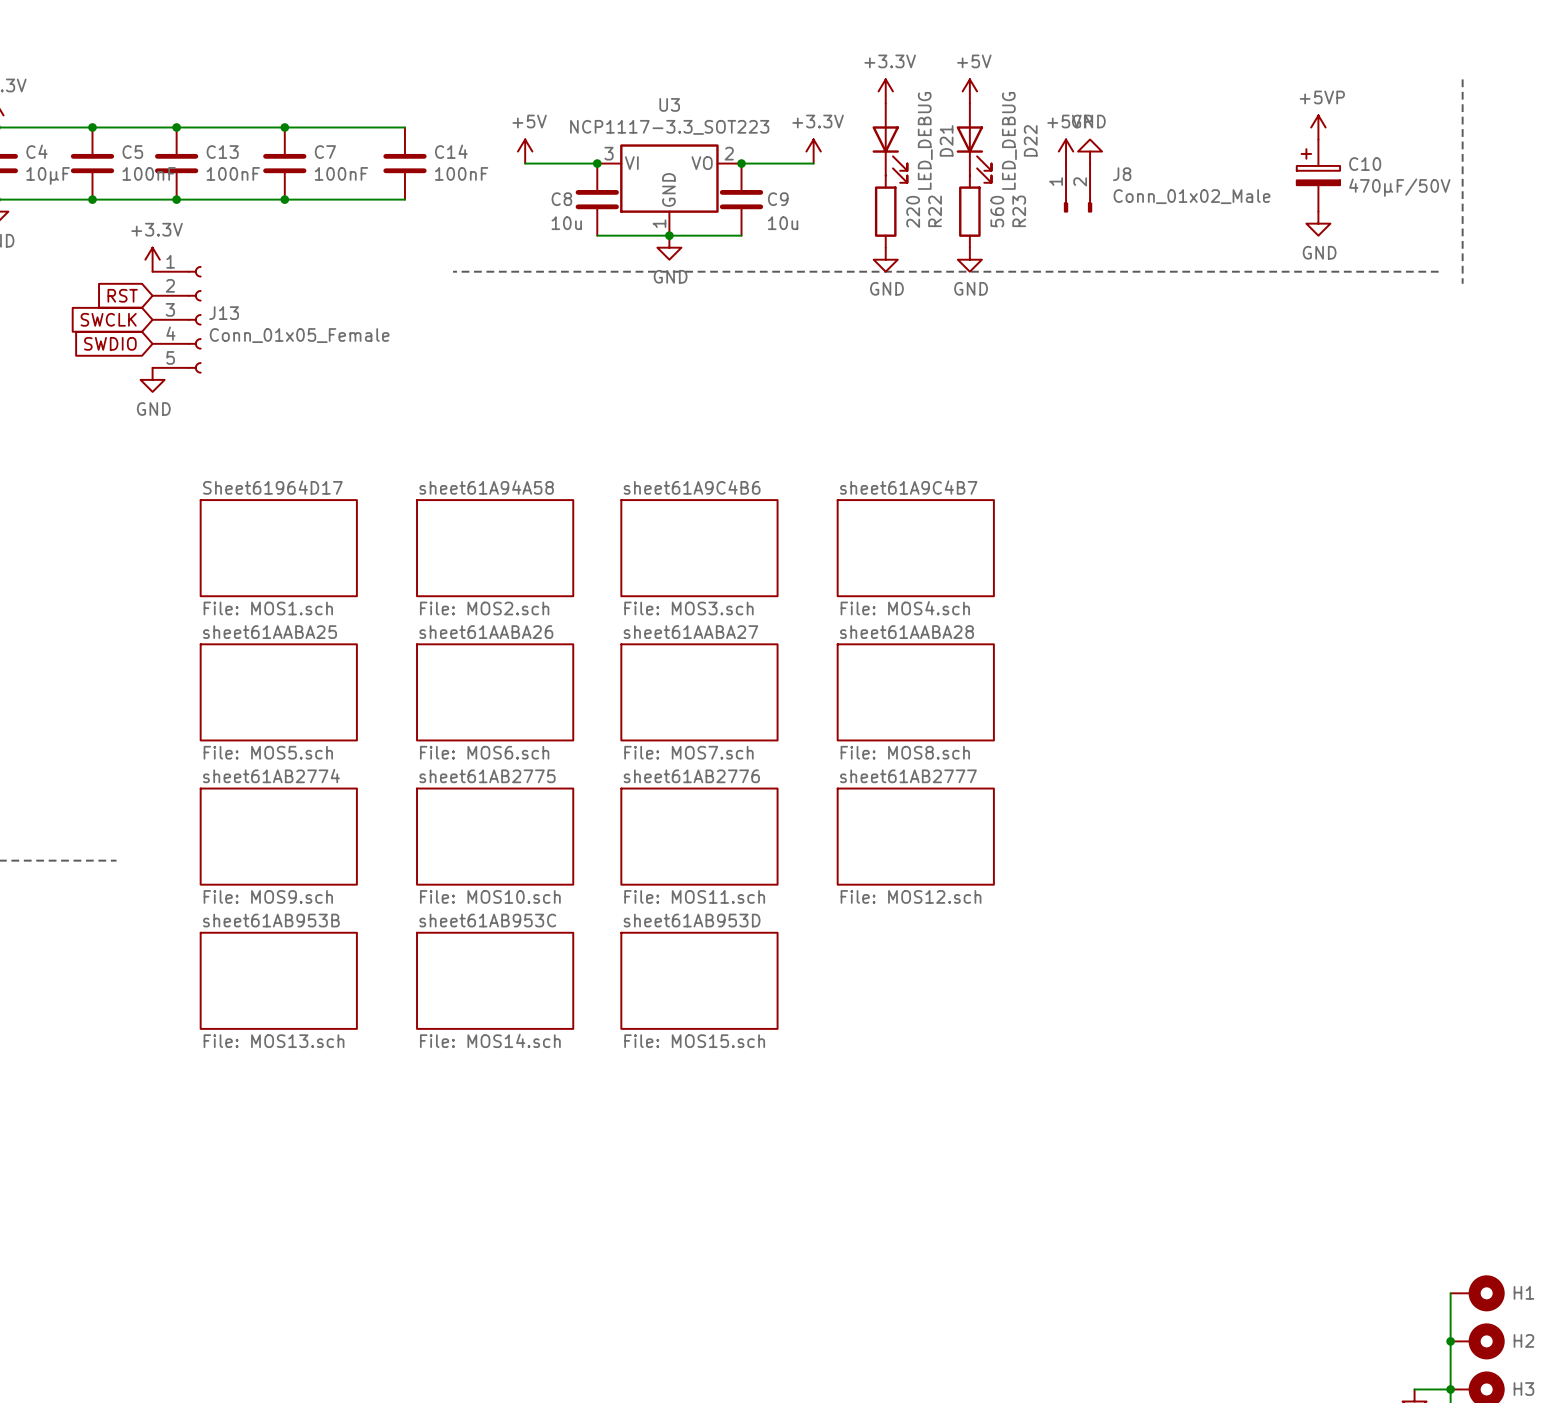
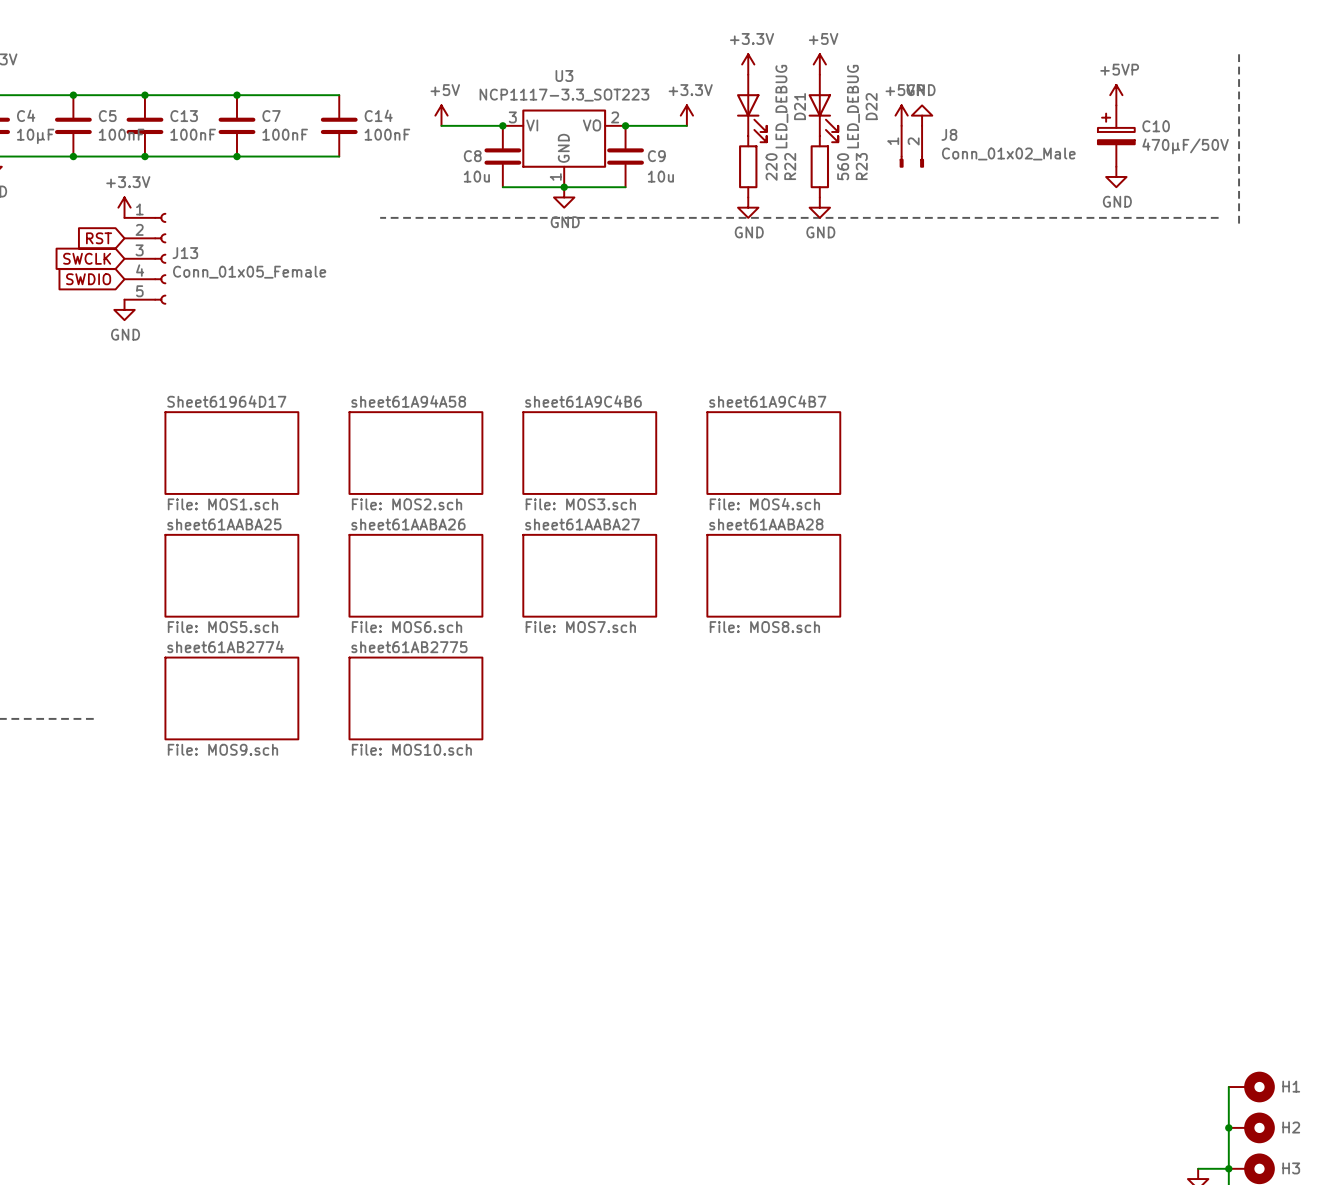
sheet sheet61AB2776: File: MOS11.sch (699, 836) -> none
sheet sheet61AB2777: File: MOS12.sch (915, 836) -> none
sheet sheet61AB953B: File: MOS13.sch (278, 980) -> none
sheet sheet61AB953C: File: MOS14.sch (495, 980) -> none
sheet sheet61AB953D: File: MOS15.sch (699, 980) -> none

